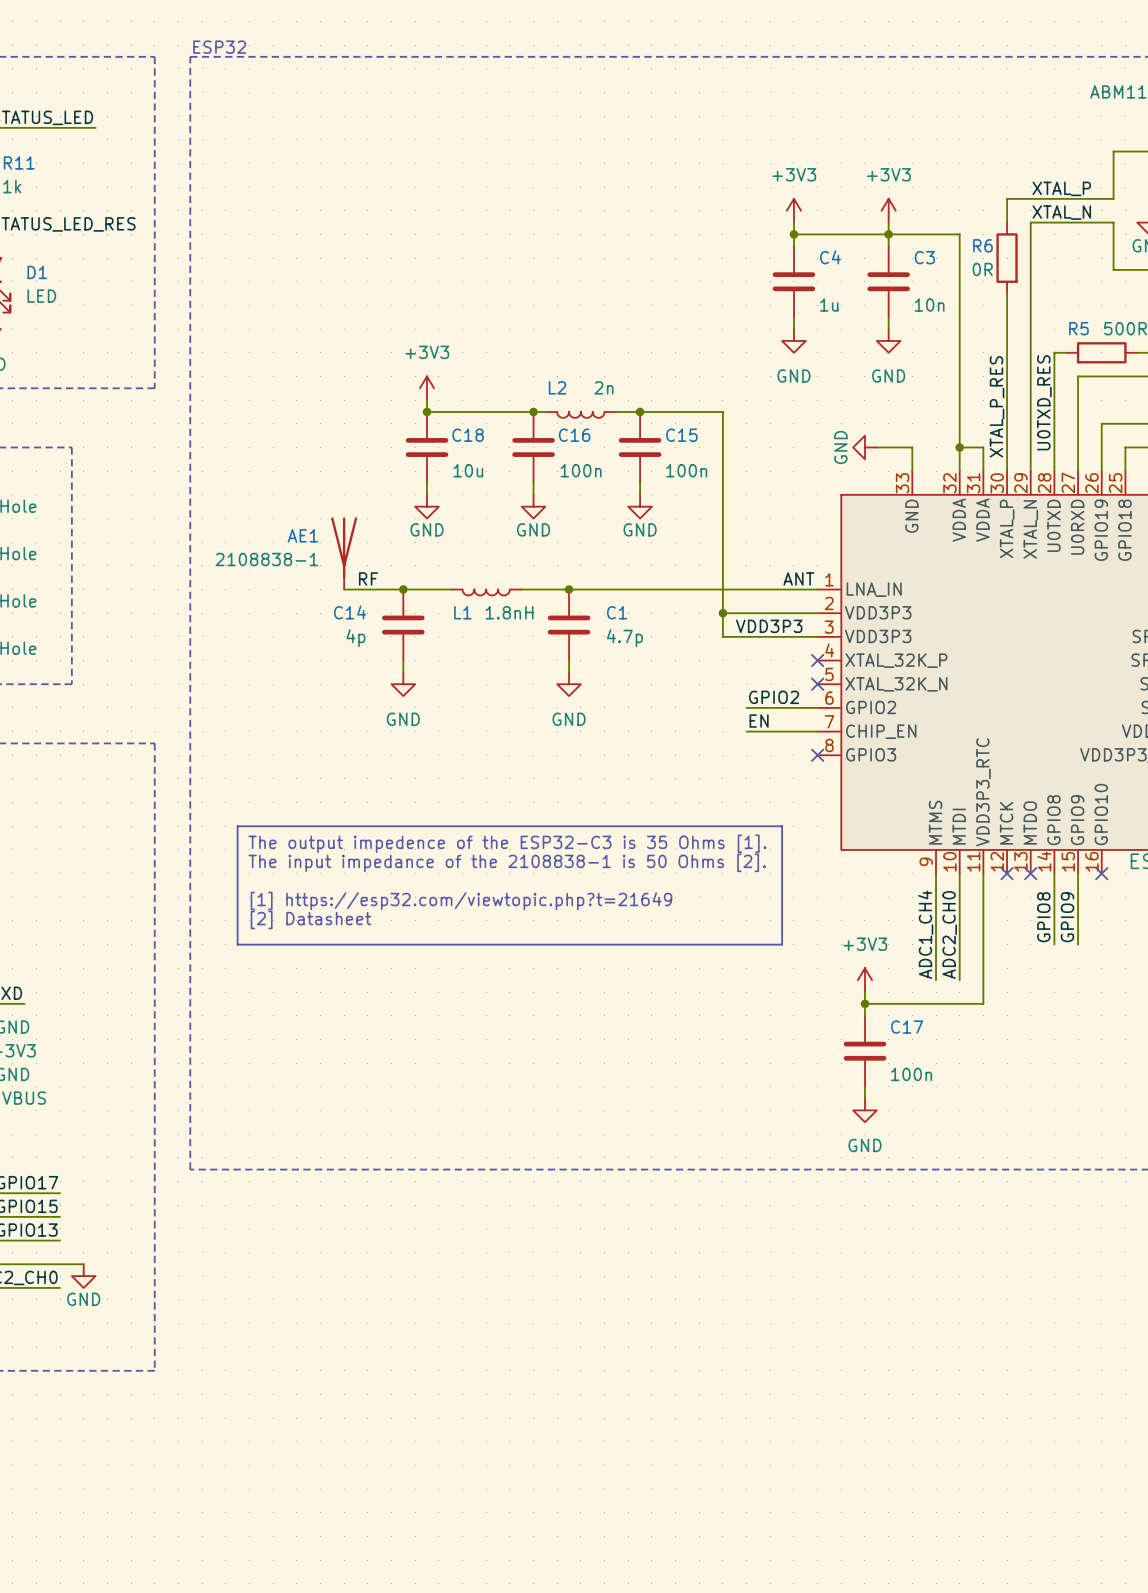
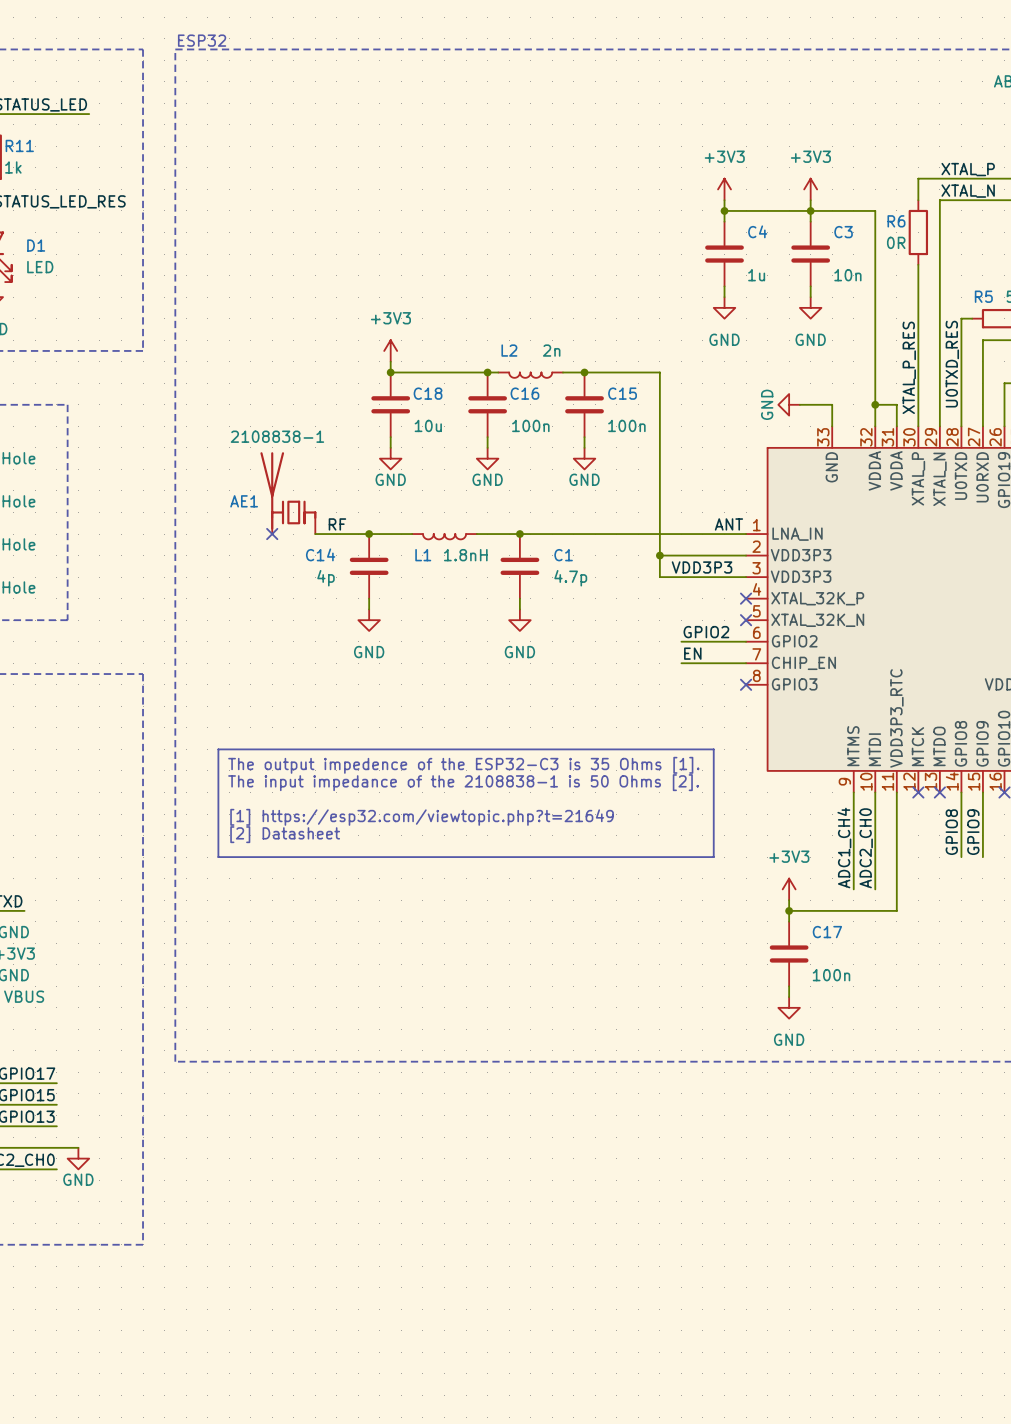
AE1 symbol: [331, 517, 358, 590] -> [260, 452, 317, 535]
AE1 name position: AE1 (302, 535) -> AE1 (244, 501)
AE1 value position: 2108838-1 (266, 559) -> 2108838-1 (277, 436)
no-connect mark: none -> (272, 534)

